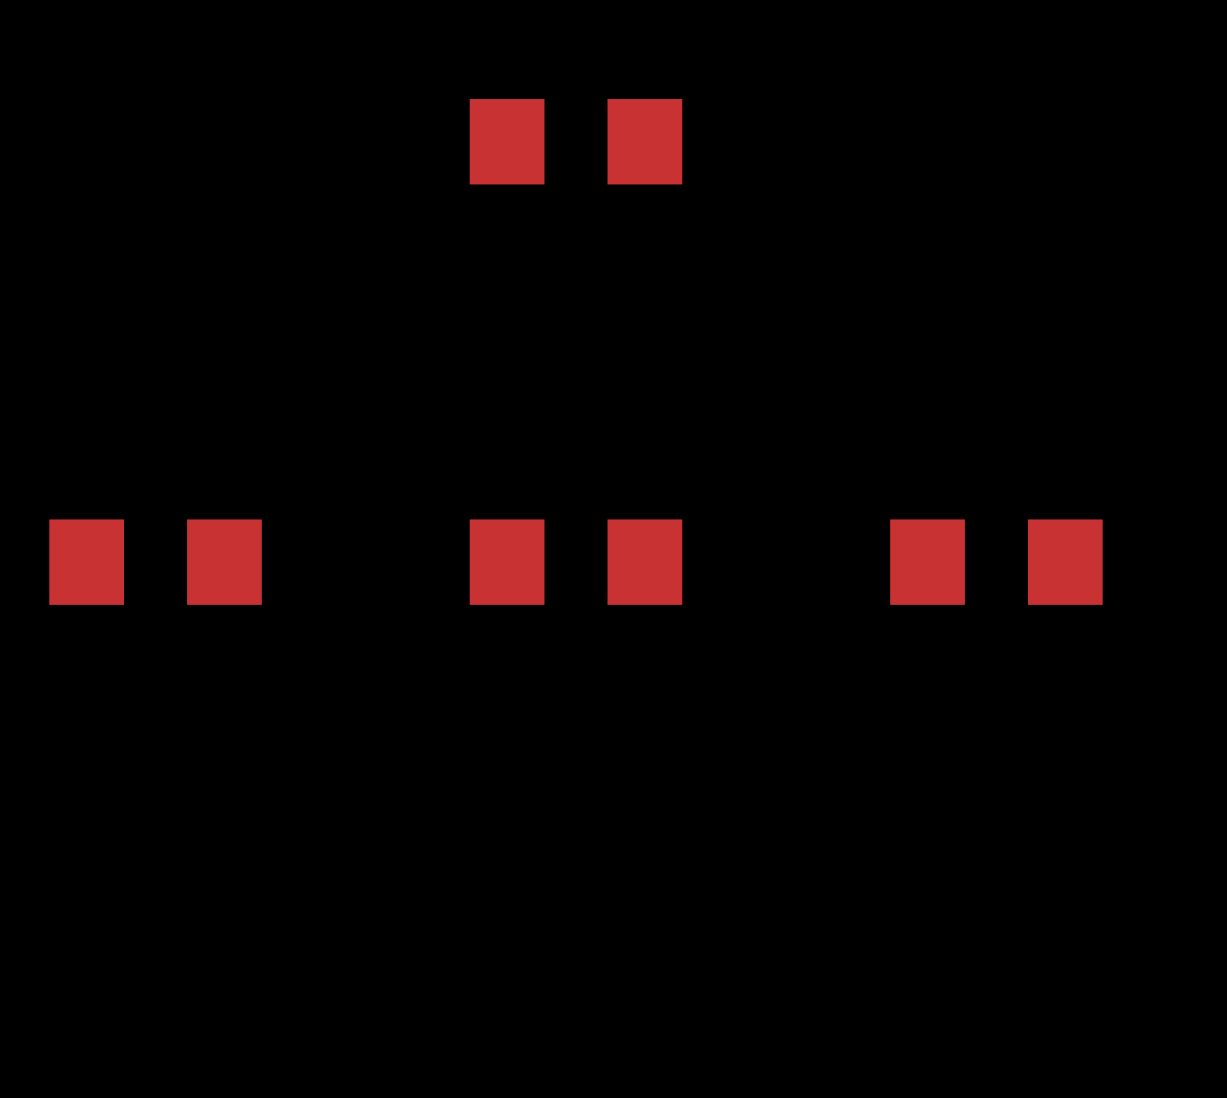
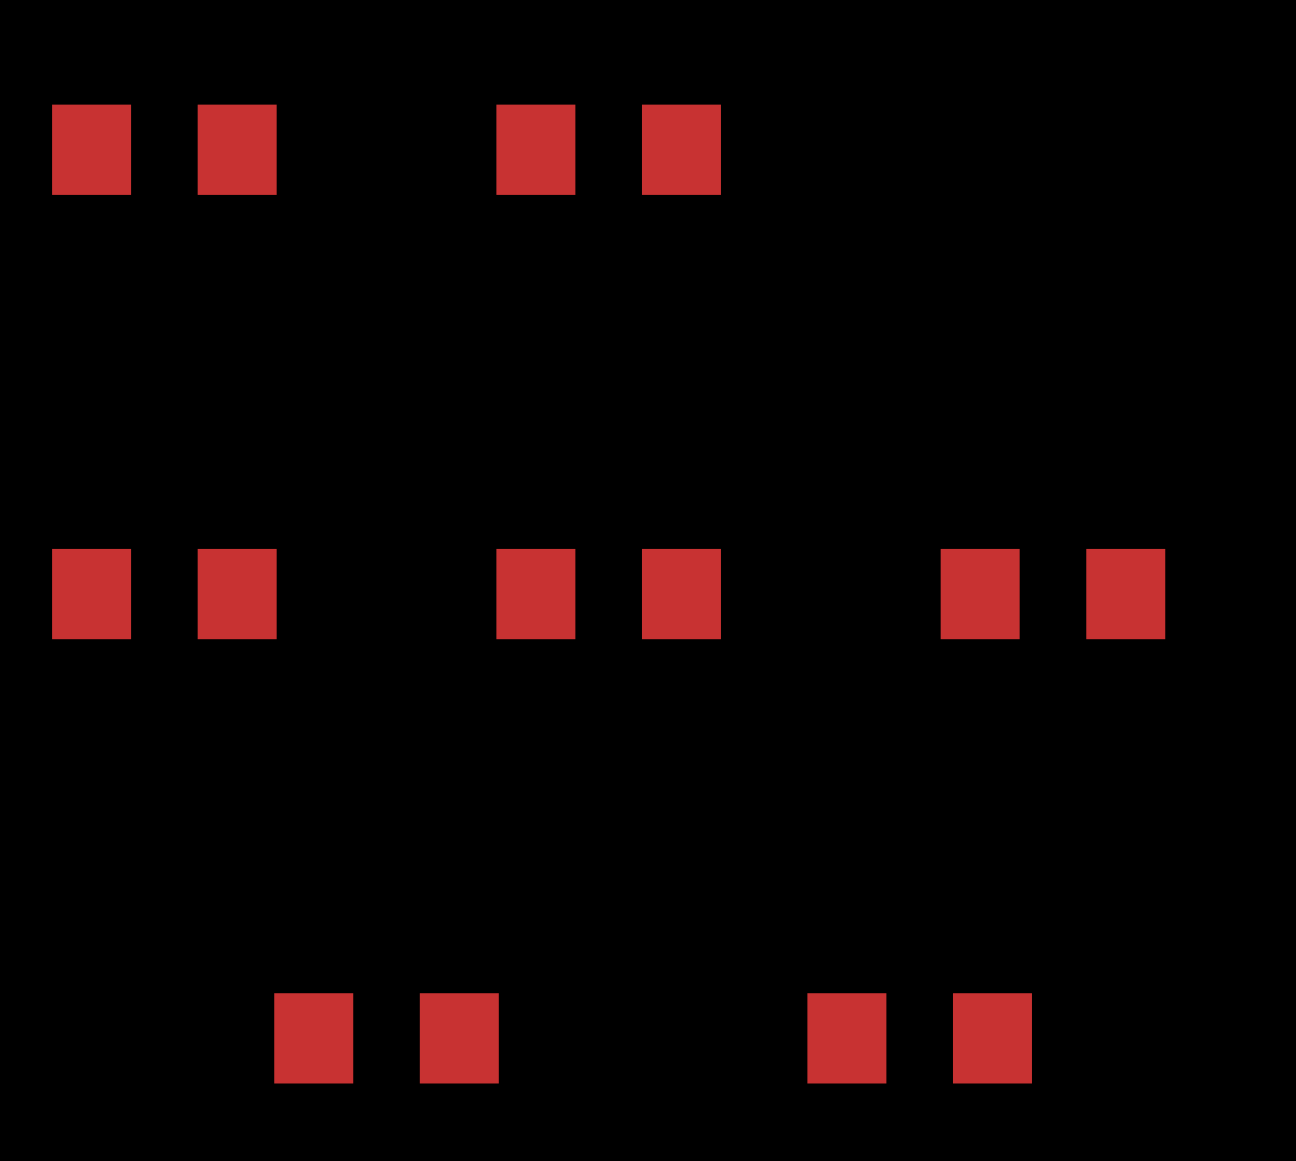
part: none -> (164, 149)
part: none -> (386, 1038)
part: none -> (919, 1038)

